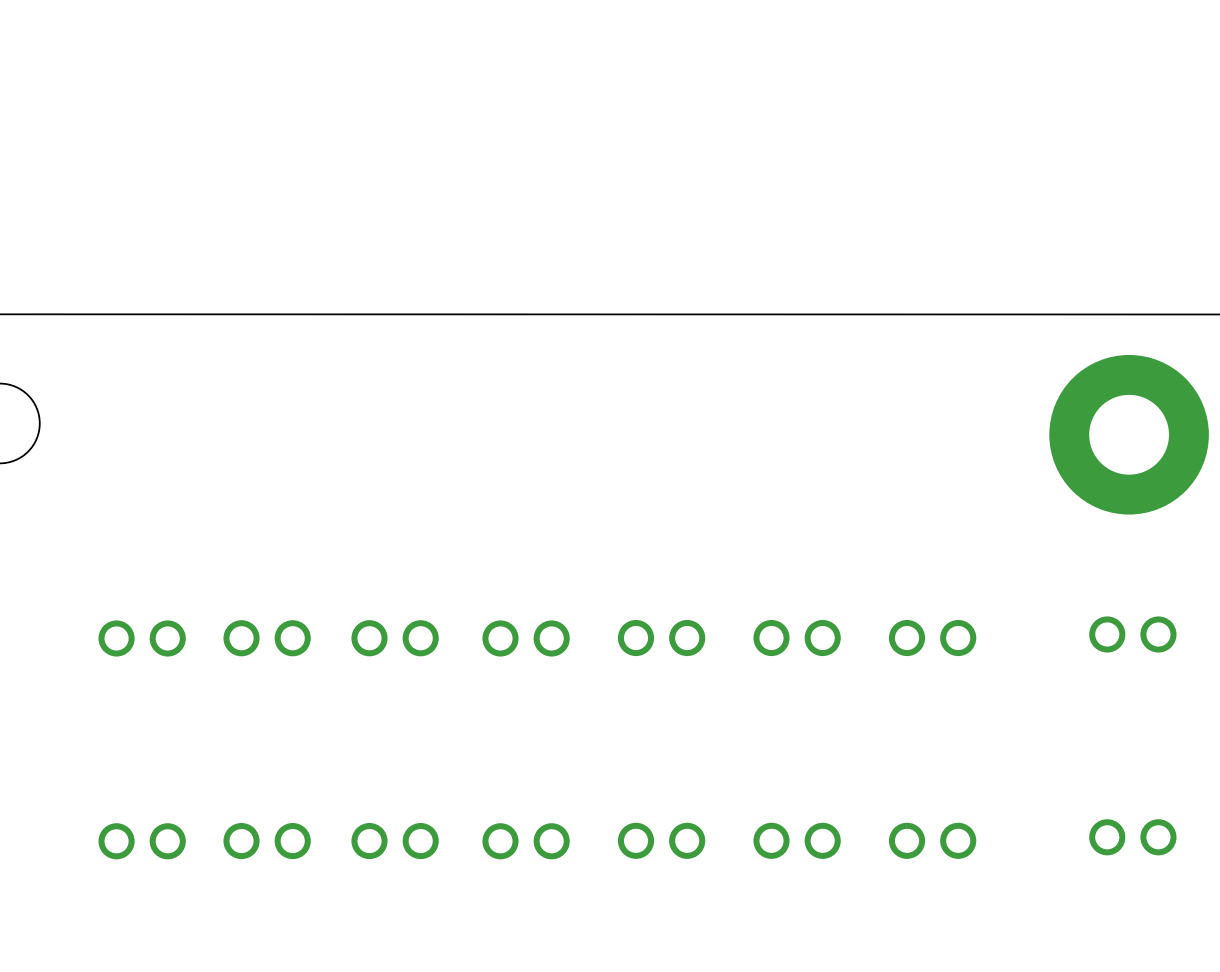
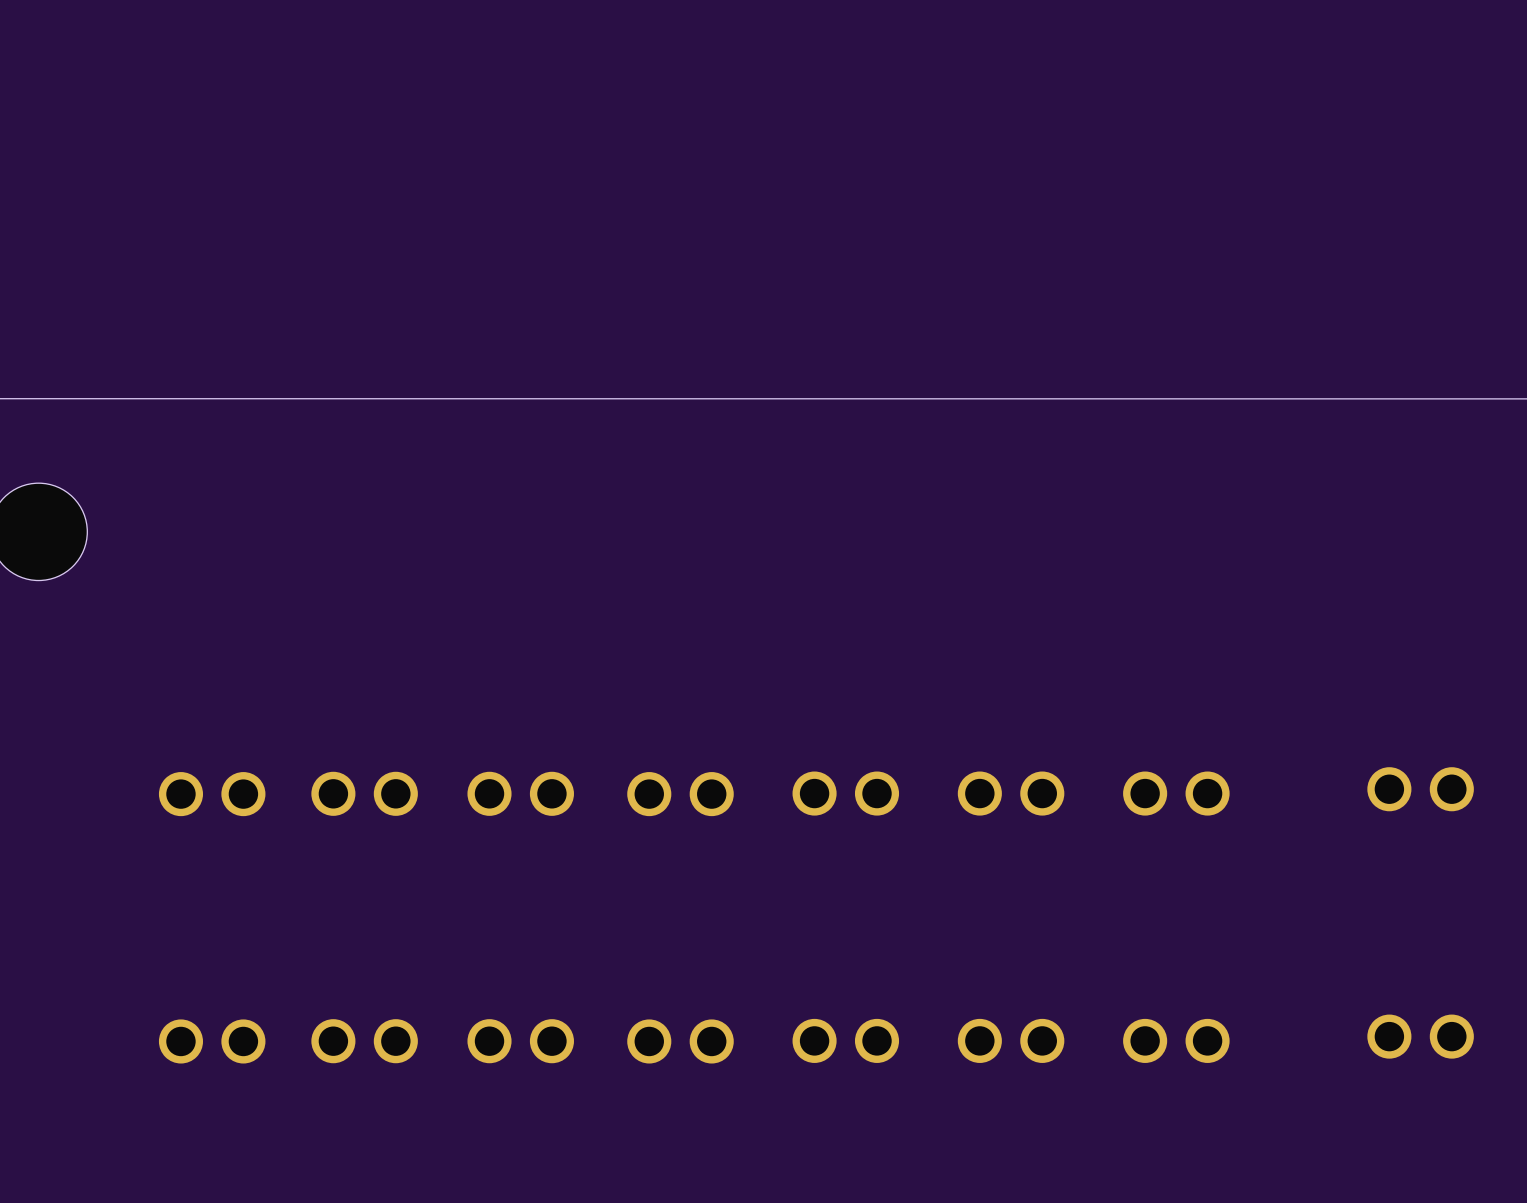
part: (1129, 434) -> none

